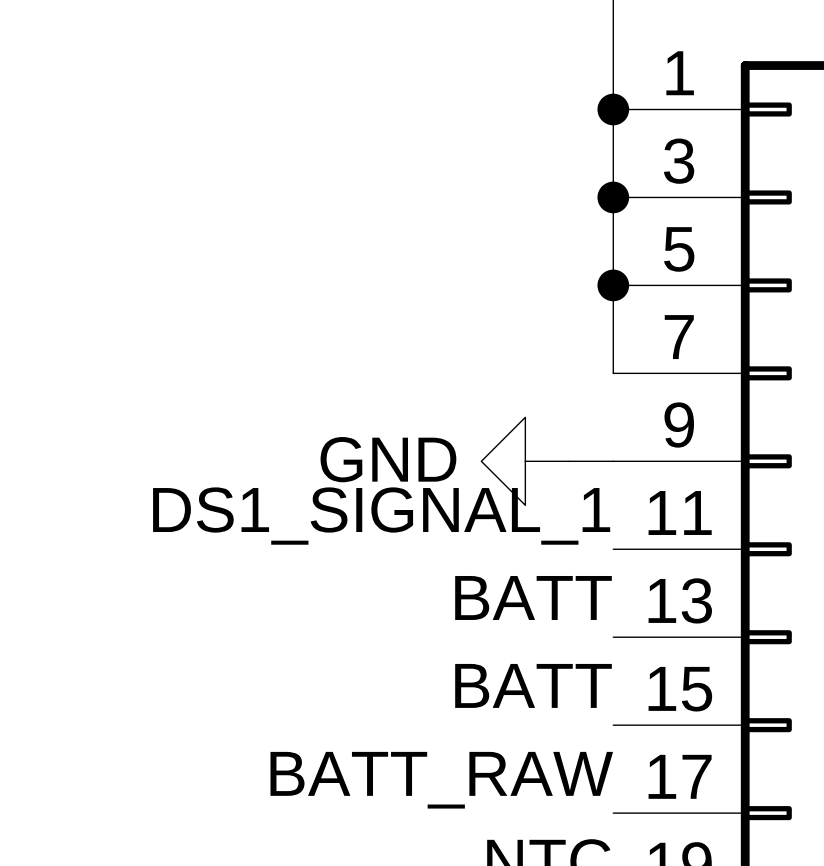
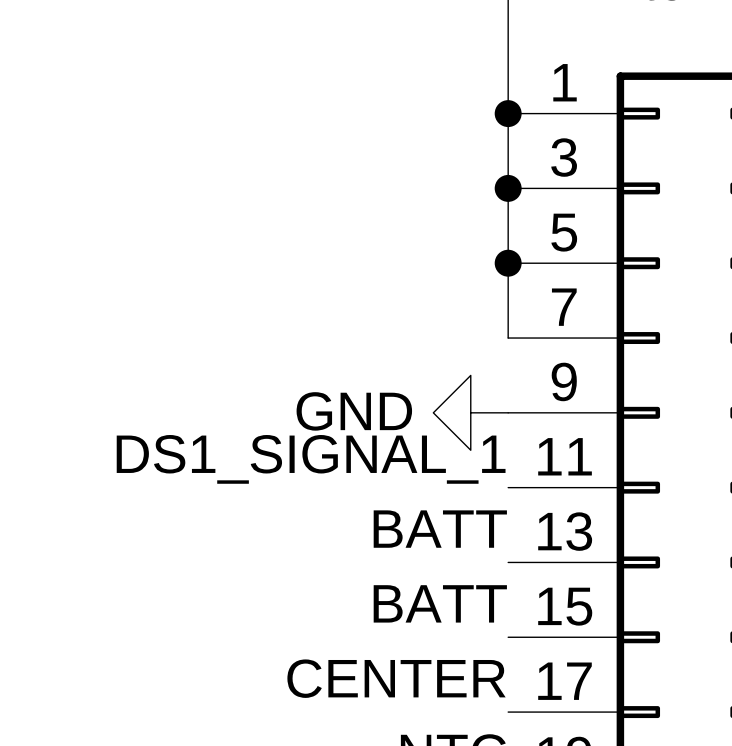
power symbol position: GND (525, 461) -> GND (470, 412)
label: BATT_RAW (441, 780) -> CENTER (396, 678)

